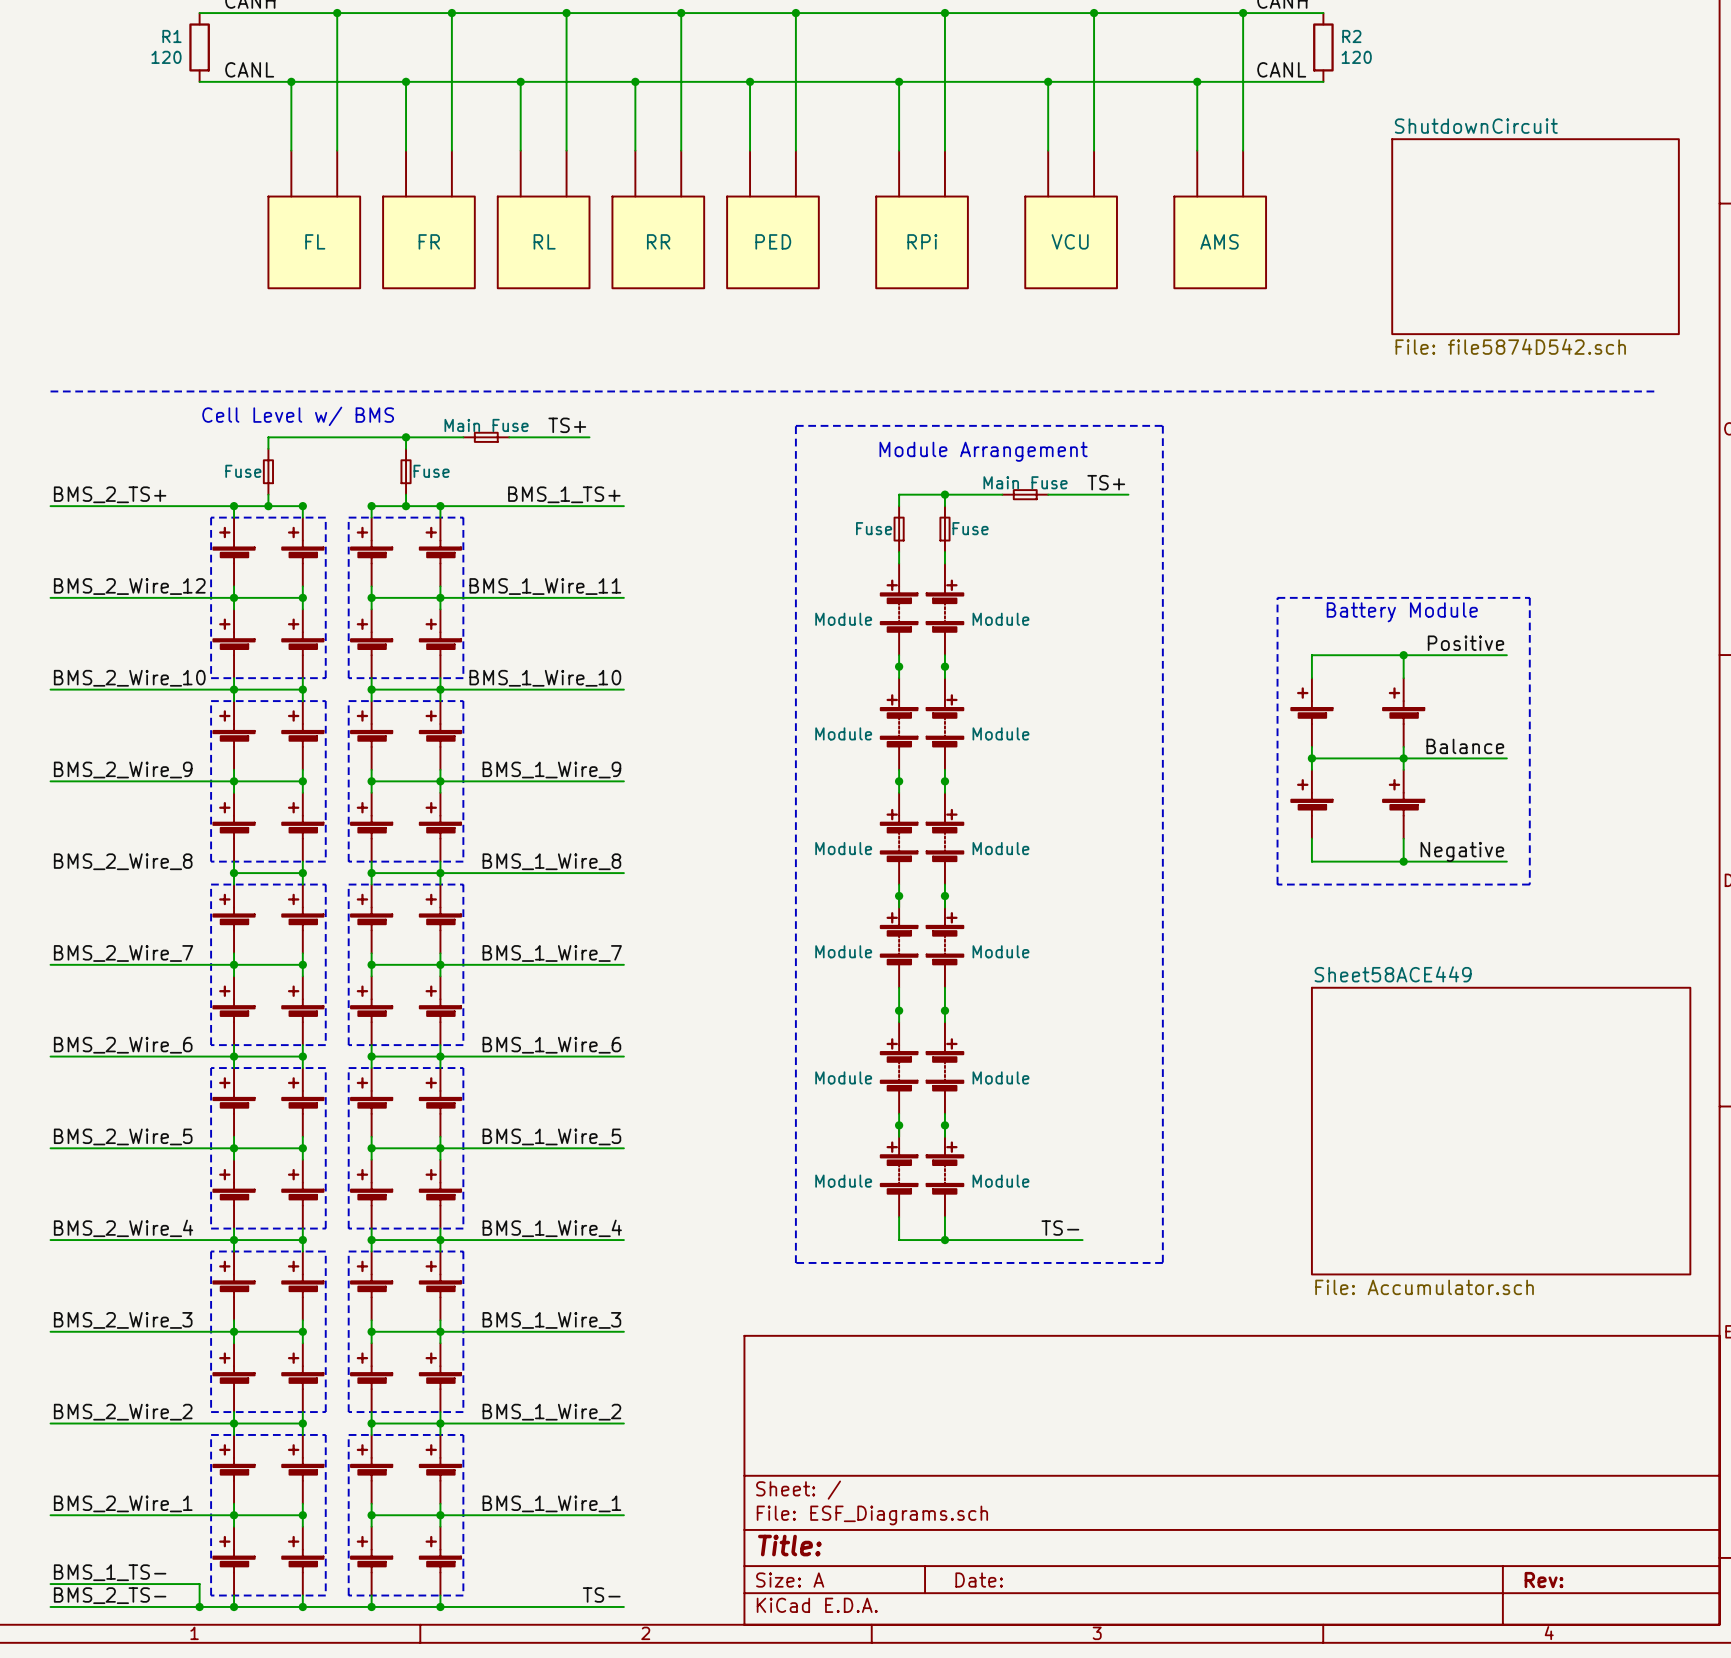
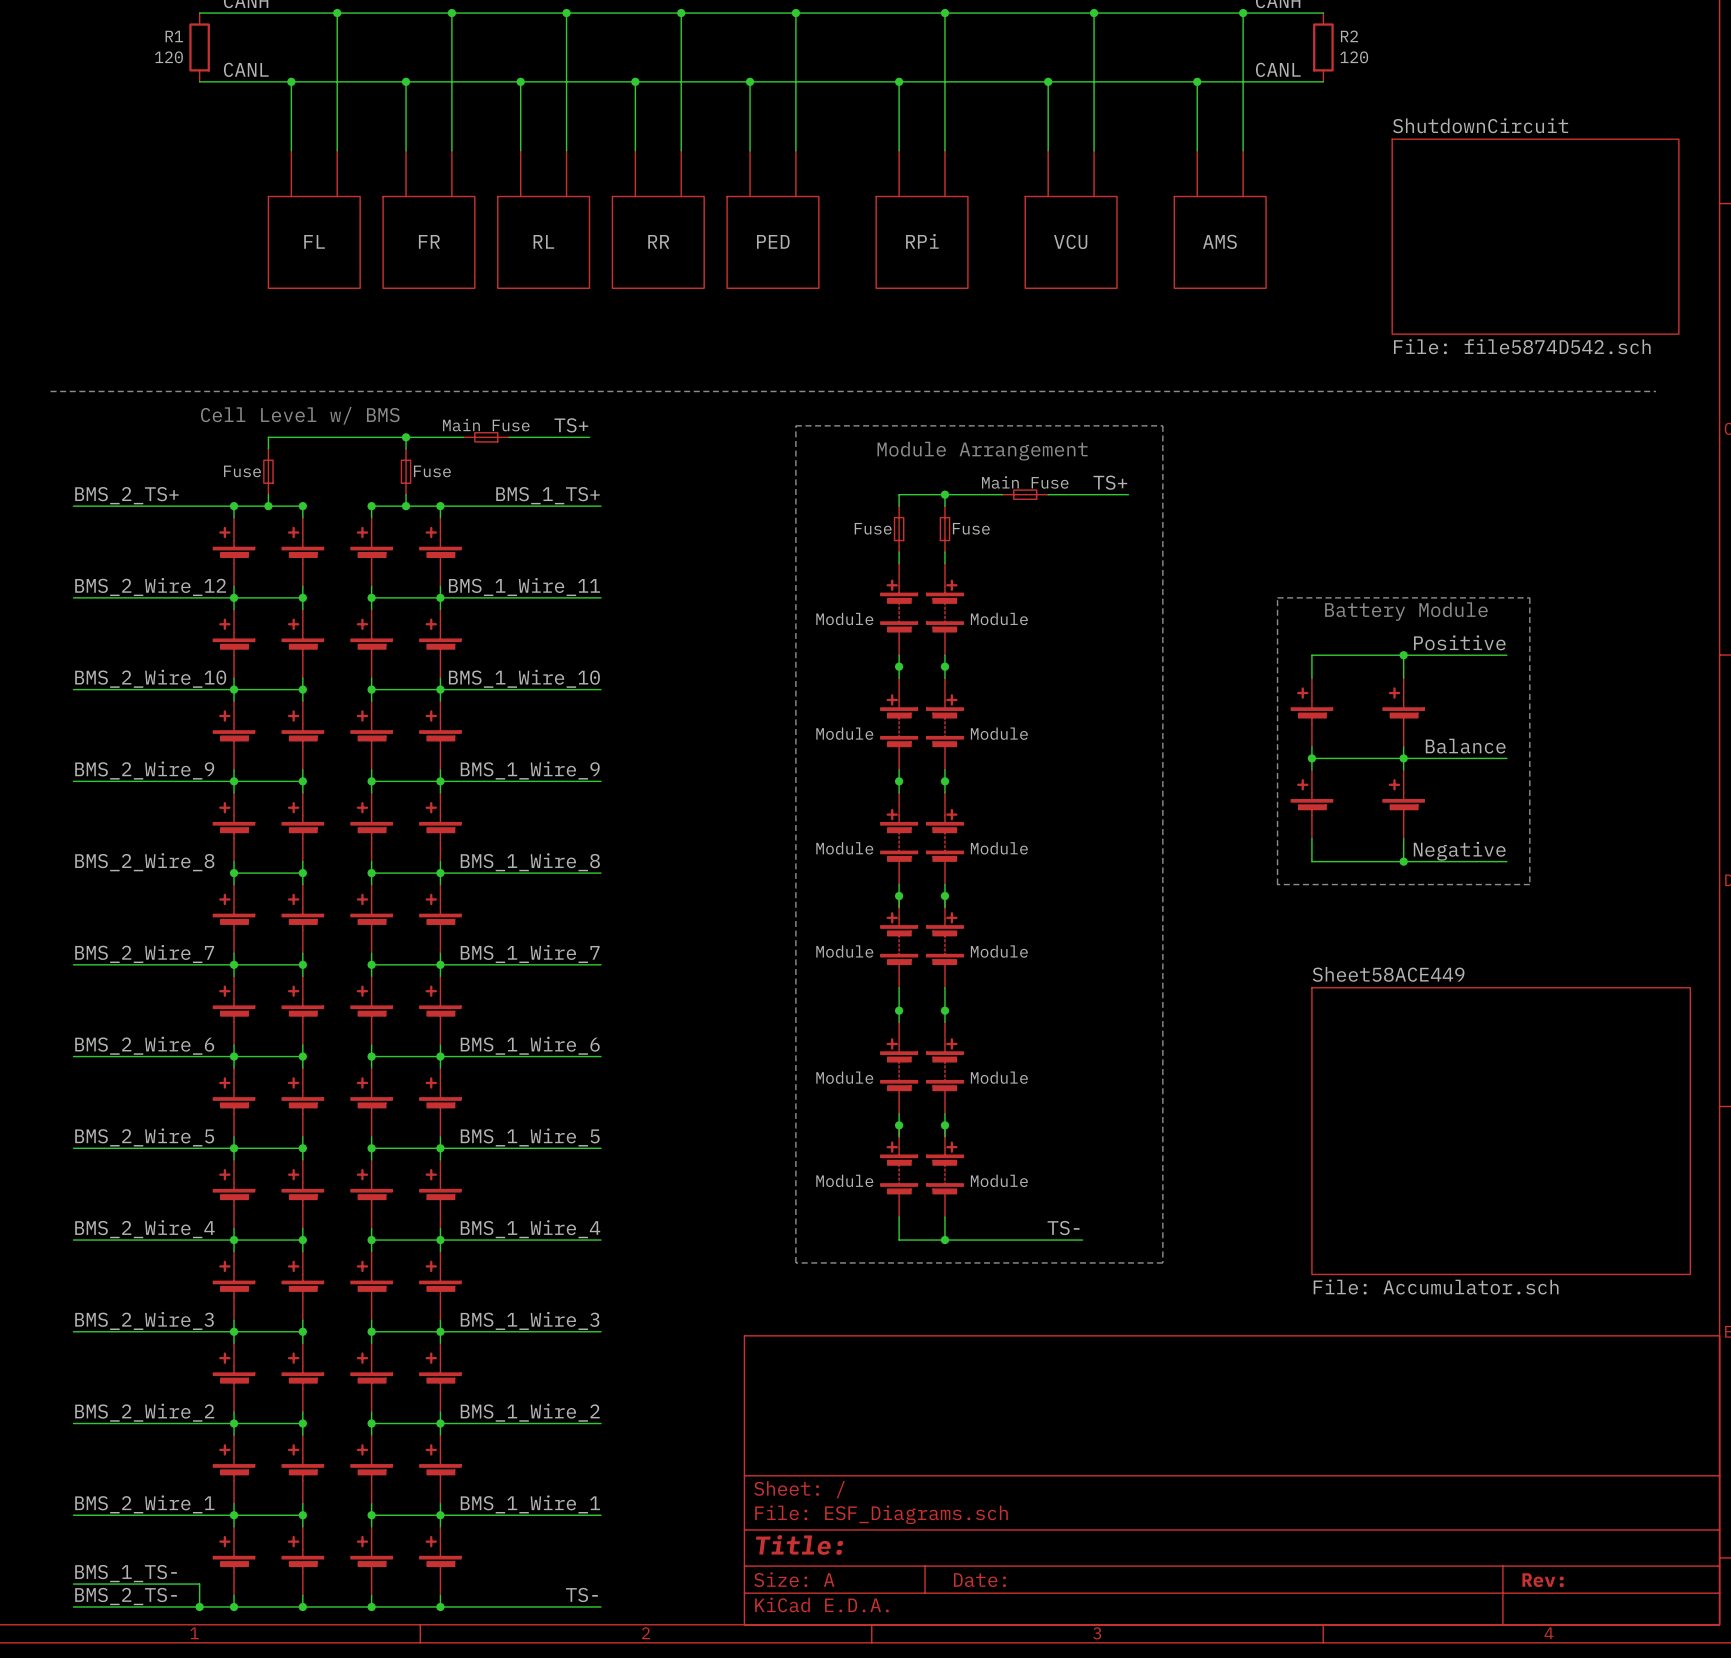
label position: BMS_2_TS+ (110, 494) -> BMS_2_TS+ (126, 495)
label position: BMS_1_TS+ (564, 494) -> BMS_1_TS+ (547, 495)
wire: (50, 506) (73, 506) -> none
wire: (600, 506) (623, 506) -> none
line: (211, 517) (211, 678) (325, 678) (325, 517) (211, 517) -> none
line: (348, 517) (463, 517) (463, 678) (348, 678) (348, 517) -> none
label position: BMS_2_Wire_12 (129, 586) -> BMS_2_Wire_12 (150, 587)
label position: BMS_1_Wire_11 (545, 586) -> BMS_1_Wire_11 (524, 587)
wire: (50, 597) (73, 597) -> none
wire: (600, 597) (623, 597) -> none
label position: BMS_2_Wire_10 (129, 678) -> BMS_2_Wire_10 (150, 678)
label position: BMS_1_Wire_10 (545, 678) -> BMS_1_Wire_10 (524, 678)
wire: (50, 689) (73, 689) -> none
wire: (600, 689) (623, 689) -> none
line: (211, 701) (211, 861) (325, 861) (325, 701) (211, 701) -> none
line: (348, 701) (463, 701) (463, 861) (348, 861) (348, 701) -> none
label position: BMS_2_Wire_9 (123, 770) -> BMS_2_Wire_9 (144, 770)
label position: BMS_1_Wire_9 (551, 770) -> BMS_1_Wire_9 (530, 770)
wire: (50, 781) (73, 781) -> none
wire: (600, 781) (623, 781) -> none
label position: BMS_2_Wire_8 (123, 861) -> BMS_2_Wire_8 (144, 862)
label position: BMS_1_Wire_8 (551, 861) -> BMS_1_Wire_8 (530, 862)
wire: (600, 873) (623, 873) -> none
line: (211, 884) (211, 1045) (325, 1045) (325, 884) (211, 884) -> none
line: (348, 884) (463, 884) (463, 1045) (348, 1045) (348, 884) -> none
label position: BMS_2_Wire_7 (123, 953) -> BMS_2_Wire_7 (144, 953)
label position: BMS_1_Wire_7 (552, 953) -> BMS_1_Wire_7 (530, 953)
wire: (50, 964) (73, 964) -> none
wire: (600, 964) (623, 964) -> none
label position: BMS_2_Wire_6 (123, 1045) -> BMS_2_Wire_6 (144, 1045)
label position: BMS_1_Wire_6 (551, 1045) -> BMS_1_Wire_6 (530, 1045)
wire: (50, 1056) (73, 1056) -> none
wire: (600, 1056) (623, 1056) -> none
line: (211, 1068) (211, 1228) (325, 1228) (325, 1068) (211, 1068) -> none
line: (348, 1068) (463, 1068) (463, 1228) (348, 1228) (348, 1068) -> none
label position: BMS_2_Wire_5 (123, 1136) -> BMS_2_Wire_5 (144, 1137)
label position: BMS_1_Wire_5 (551, 1136) -> BMS_1_Wire_5 (530, 1137)
wire: (50, 1148) (73, 1148) -> none
wire: (600, 1148) (623, 1148) -> none
label position: BMS_2_Wire_4 (123, 1228) -> BMS_2_Wire_4 (144, 1229)
label position: BMS_1_Wire_4 (552, 1228) -> BMS_1_Wire_4 (530, 1229)
wire: (50, 1240) (73, 1240) -> none
wire: (600, 1240) (623, 1240) -> none
line: (211, 1251) (211, 1412) (325, 1412) (325, 1251) (211, 1251) -> none
line: (348, 1251) (463, 1251) (463, 1412) (348, 1412) (348, 1251) -> none
label position: BMS_2_Wire_3 (123, 1320) -> BMS_2_Wire_3 (144, 1320)
label position: BMS_1_Wire_3 (551, 1320) -> BMS_1_Wire_3 (530, 1320)
wire: (50, 1331) (73, 1331) -> none
wire: (600, 1331) (623, 1331) -> none
label position: BMS_2_Wire_2 (123, 1412) -> BMS_2_Wire_2 (144, 1412)
label position: BMS_1_Wire_2 (551, 1412) -> BMS_1_Wire_2 (530, 1412)
wire: (50, 1423) (73, 1423) -> none
wire: (600, 1423) (623, 1423) -> none
line: (211, 1434) (211, 1595) (325, 1595) (325, 1434) (211, 1434) -> none
line: (348, 1434) (463, 1434) (463, 1595) (348, 1595) (348, 1434) -> none
label position: BMS_2_Wire_1 (123, 1503) -> BMS_2_Wire_1 (144, 1504)
label position: BMS_1_Wire_1 (551, 1503) -> BMS_1_Wire_1 (530, 1504)
wire: (50, 1515) (73, 1515) -> none
wire: (600, 1515) (623, 1515) -> none
label position: BMS_1_TS- (110, 1572) -> BMS_1_TS- (126, 1573)
wire: (50, 1584) (73, 1584) -> none
label position: TS- (601, 1594) -> TS- (581, 1594)
label position: BMS_2_TS- (110, 1595) -> BMS_2_TS- (126, 1596)
wire: (50, 1606) (73, 1606) -> none
wire: (600, 1606) (623, 1606) -> none

